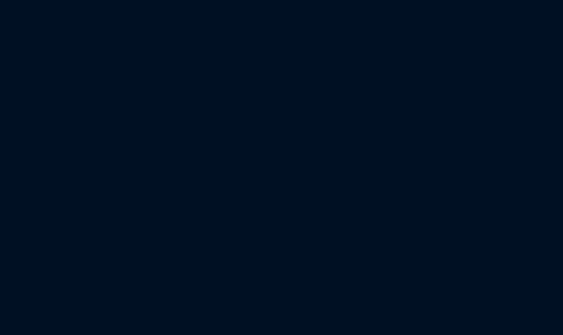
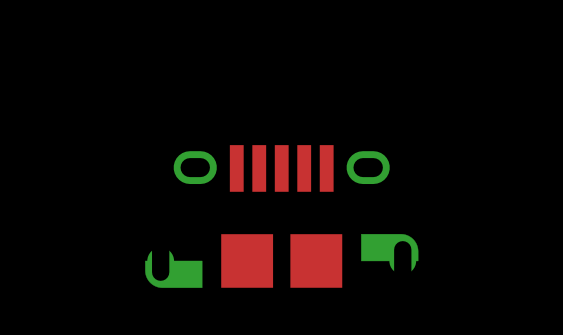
part: none -> (281, 216)

